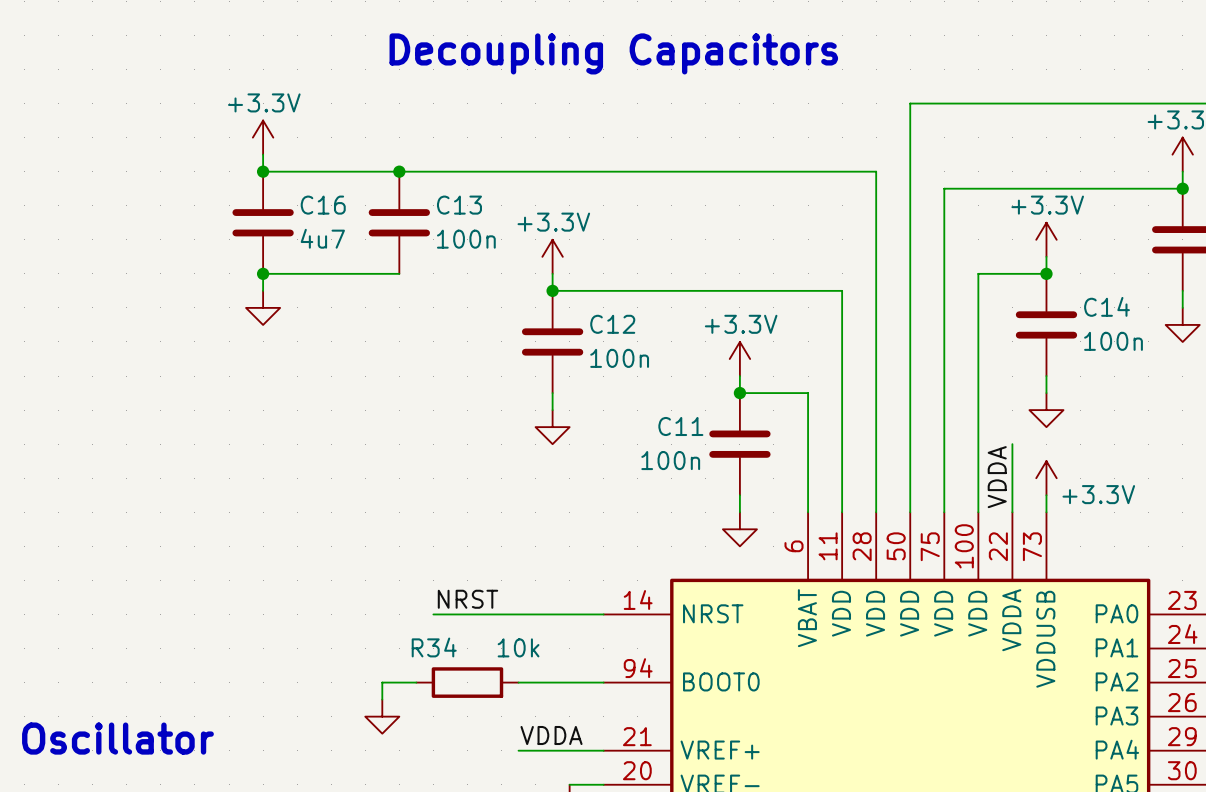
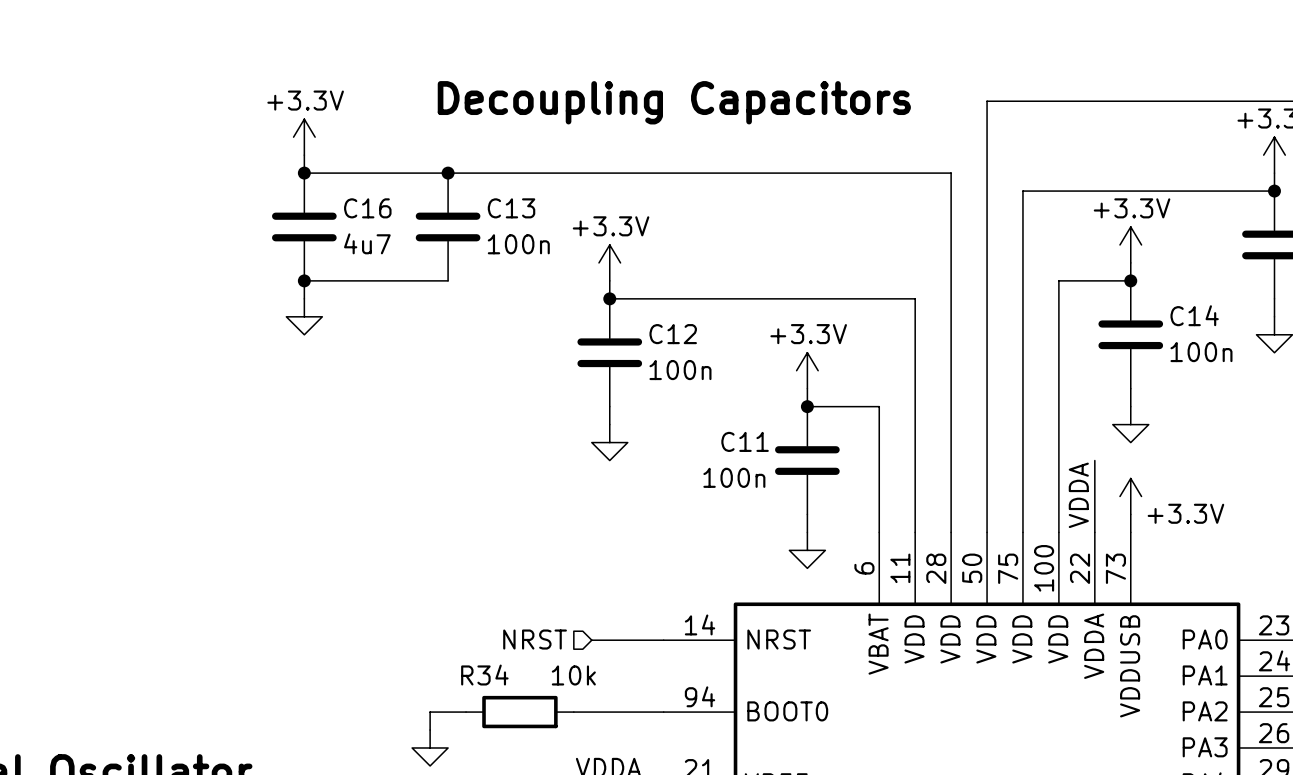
text position: Decoupling Capacitors (613, 53) -> Decoupling Capacitors (674, 102)
label: NRST (467, 599) -> none
hierarchical label: none -> NRST (535, 639)
wire: (433, 614) (535, 614) -> none

